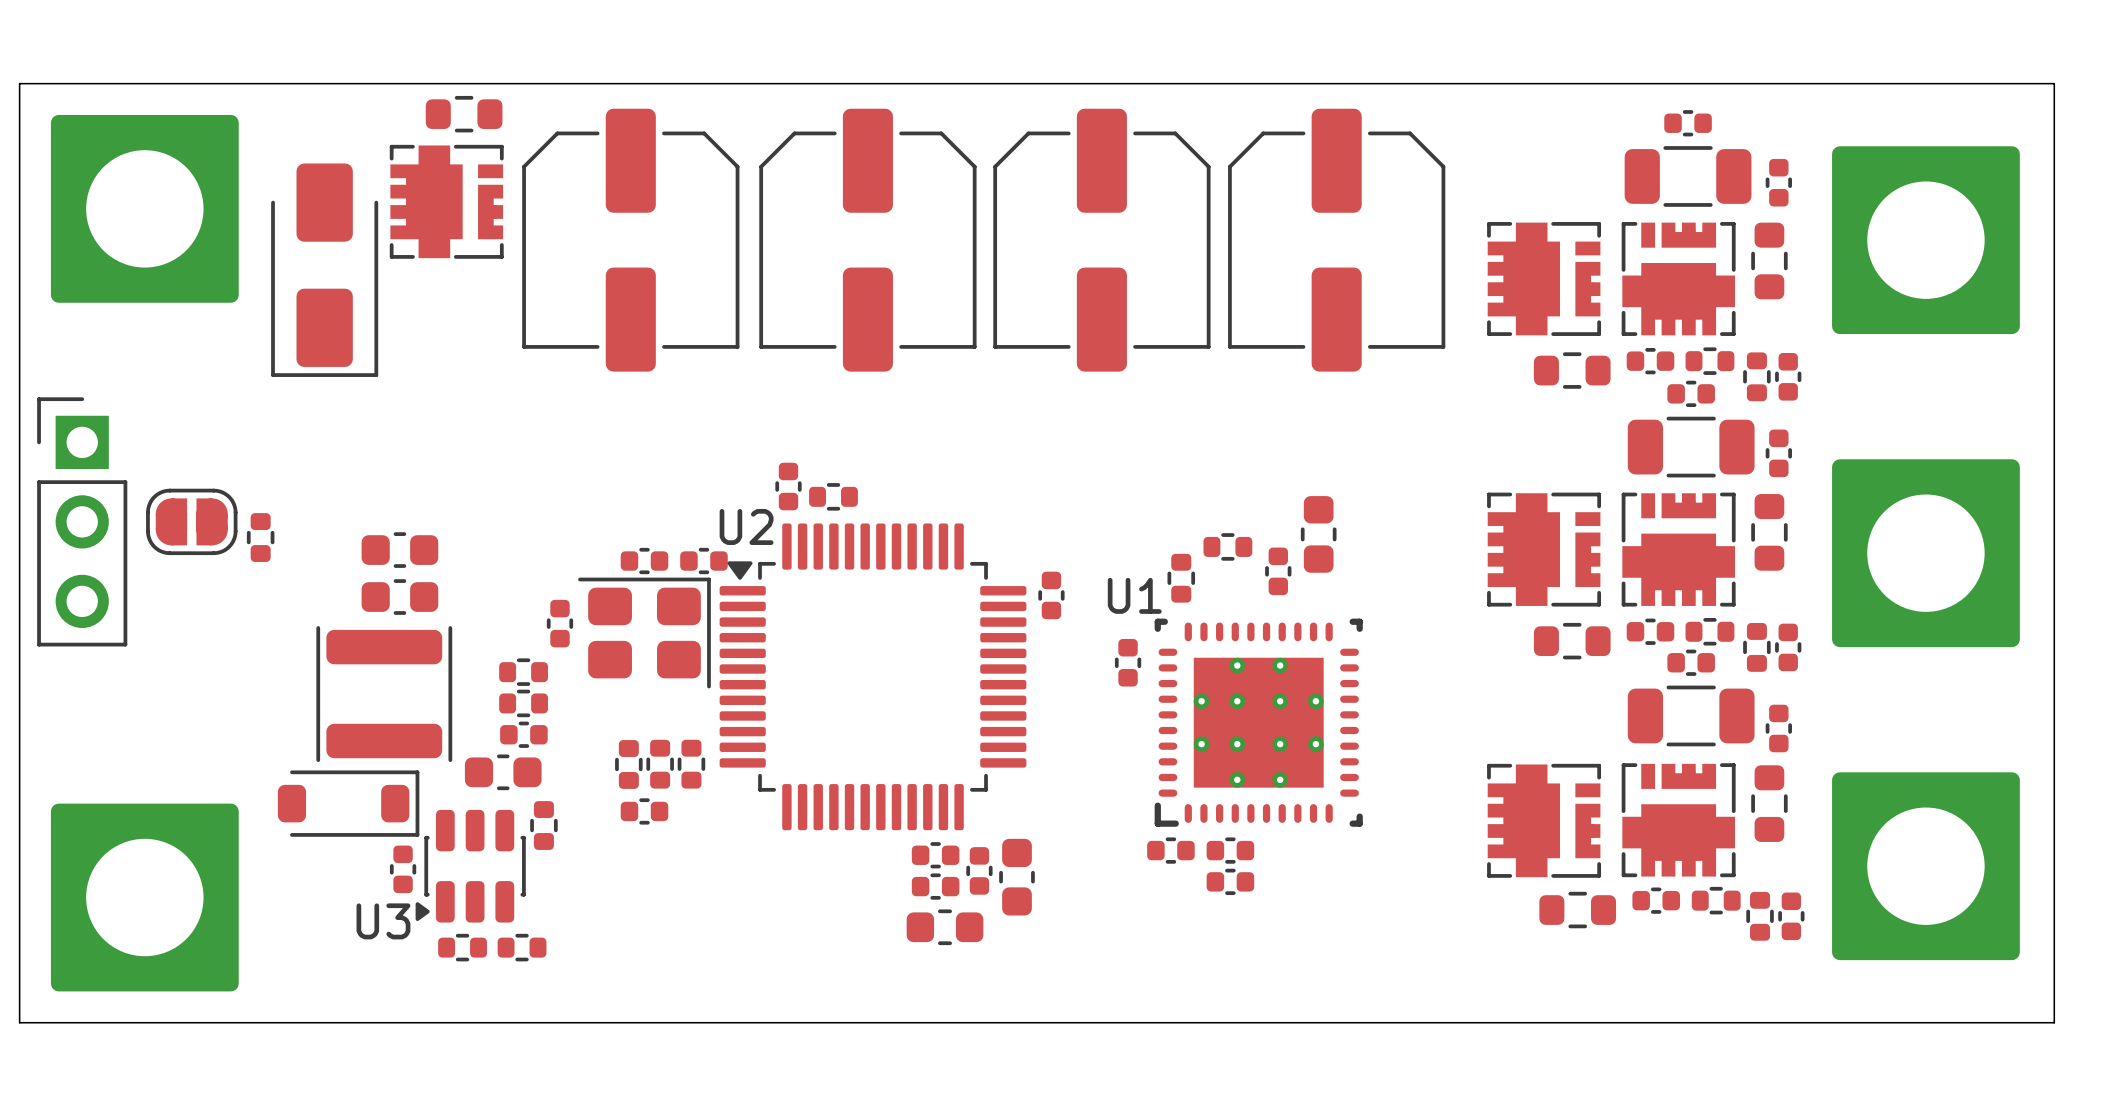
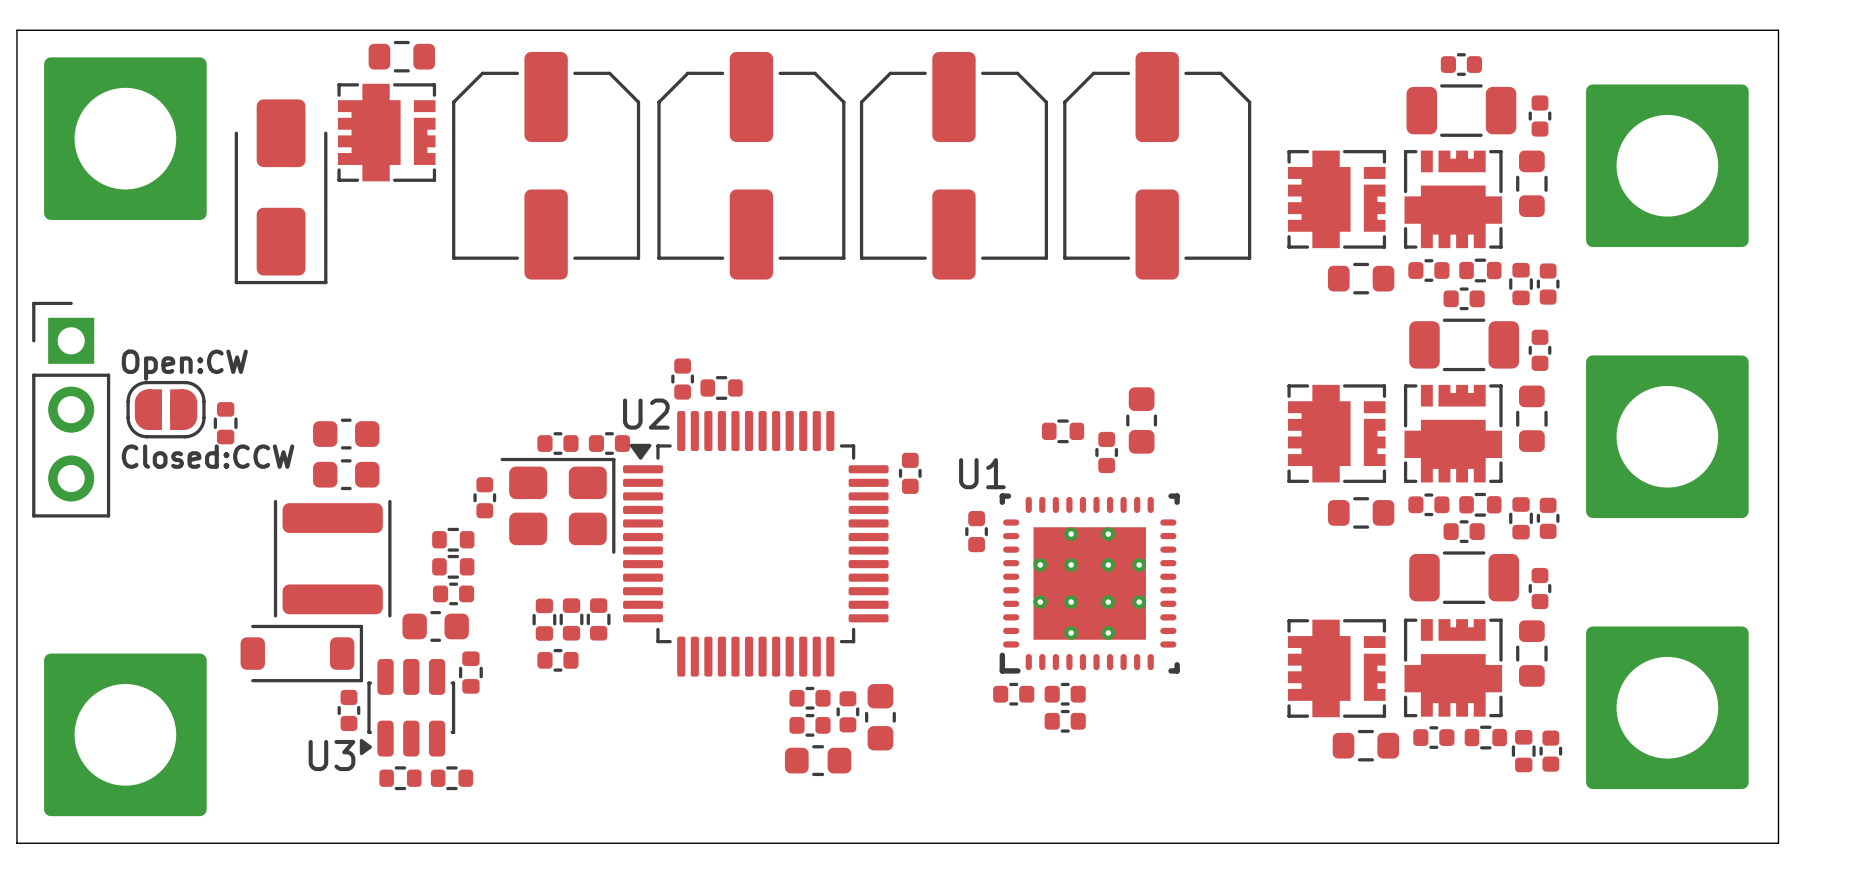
text: none -> Open:CW (184, 365)
text: none -> Closed:CCW (208, 456)
part: (1181, 578) -> none

